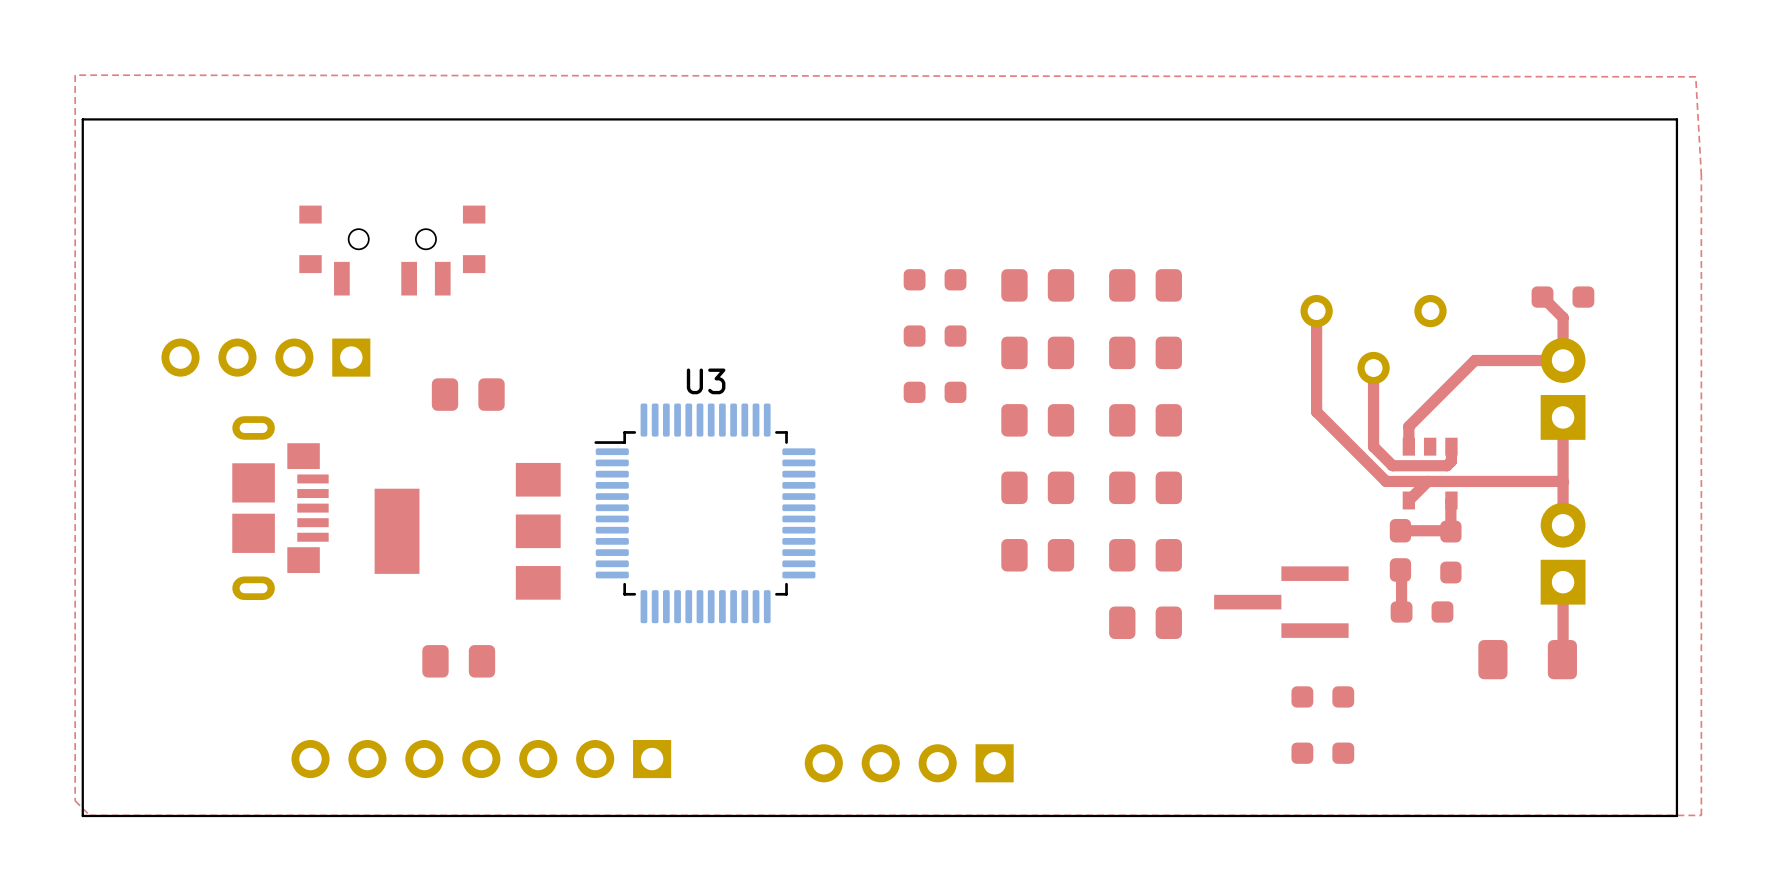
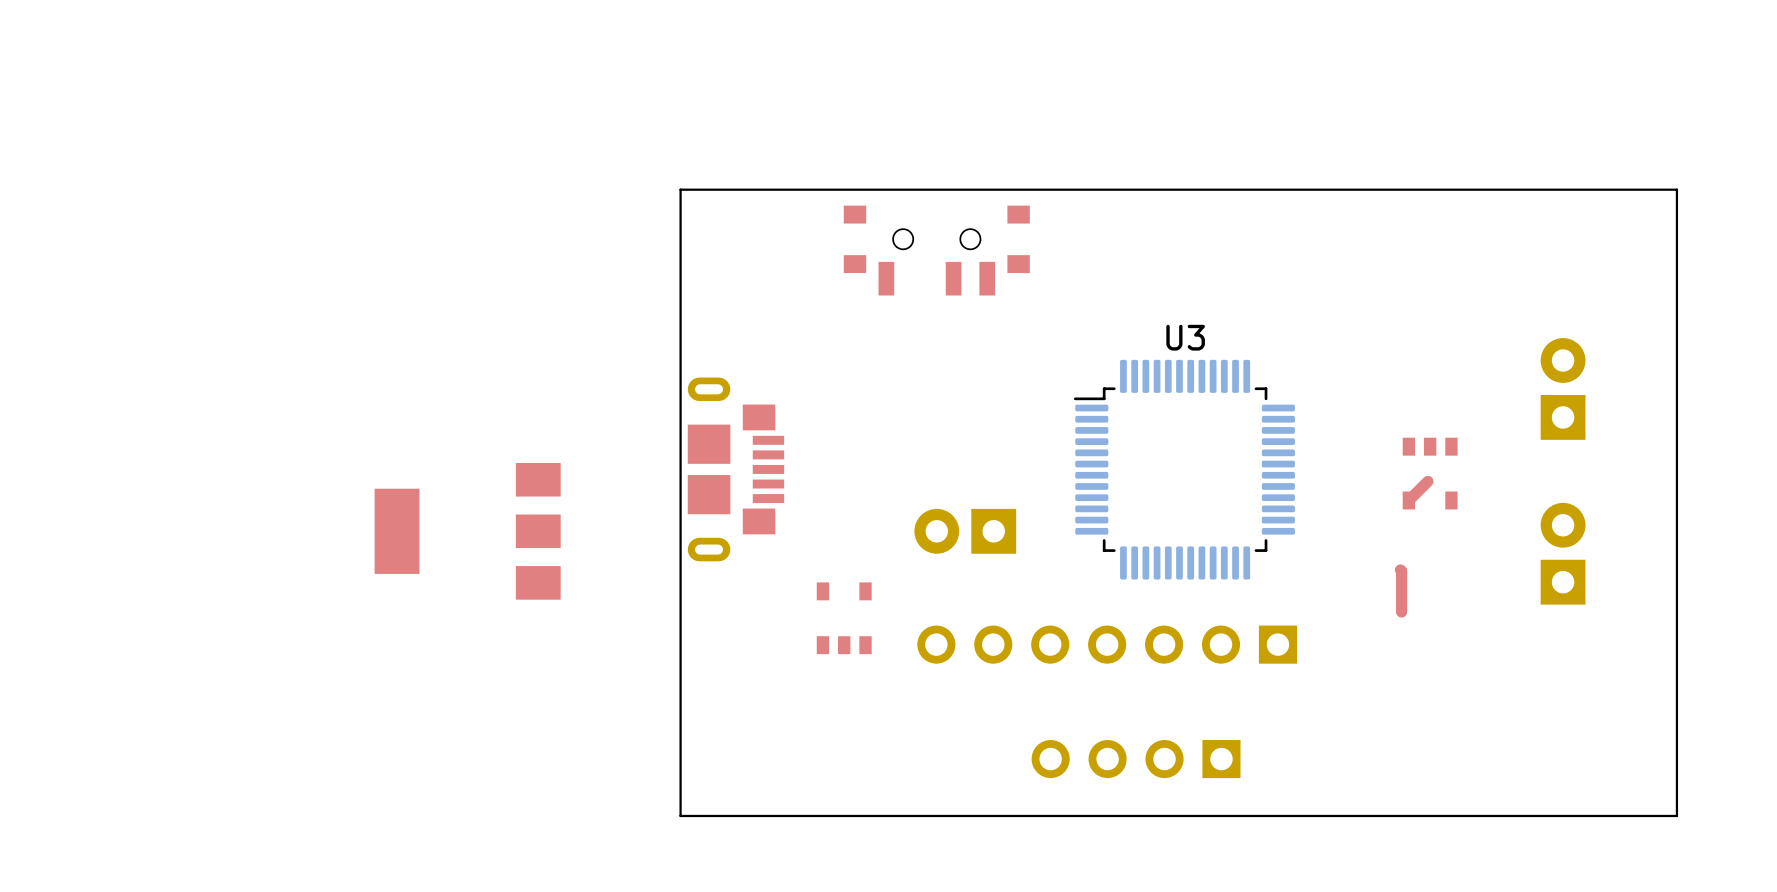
top zone outline: (75, 75) (1695, 76) (1701, 175) (1701, 815) (89, 815) (75, 800) (75, 75) -> none
board edge: (1676, 189) (1676, 119) (82, 119) (82, 815) (680, 815) -> (1676, 189) (680, 189) (680, 815)
part position: (392, 250) -> (936, 250)
part: (935, 279) -> none
part: (1037, 285) -> none
part: (1145, 285) -> none
top track: (1542, 297) (1563, 317) (1563, 360) (1474, 360) (1408, 426) (1408, 446) -> none
part: (1562, 297) -> none
top track: (1316, 311) (1316, 411) (1386, 481) (1563, 481) -> none
part: (935, 336) -> none
part: (1373, 339) -> none
part: (1037, 352) -> none
part: (1145, 352) -> none
part: (265, 357) -> none
top track: (1373, 368) (1373, 446) (1392, 465) (1446, 465) (1451, 461) (1451, 446) -> none
part: (935, 392) -> none
part: (468, 394) -> none
top track: (1563, 417) (1563, 525) -> none
part: (1037, 420) -> none
part: (1145, 420) -> none
part: (1037, 487) -> none
part: (1145, 487) -> none
top track: (1451, 500) (1450, 531) (1400, 530) -> none
part position: (280, 508) -> (735, 469)
U3 position: (704, 513) -> (1184, 469)
part: none -> (965, 531)
part: (1400, 550) -> none
part: (1450, 552) -> none
part: (1037, 555) -> none
part: (1145, 555) -> none
top track: (1563, 582) (1562, 659) -> none
part: (1281, 602) -> none
part: (1422, 611) -> none
part: none -> (844, 618)
part: (1145, 622) -> none
part: none -> (1107, 644)
part: (1527, 659) -> none
part: (458, 661) -> none
part: (1322, 696) -> none
part: (1322, 753) -> none
part: (481, 759) -> none
part position: (909, 763) -> (1136, 759)

